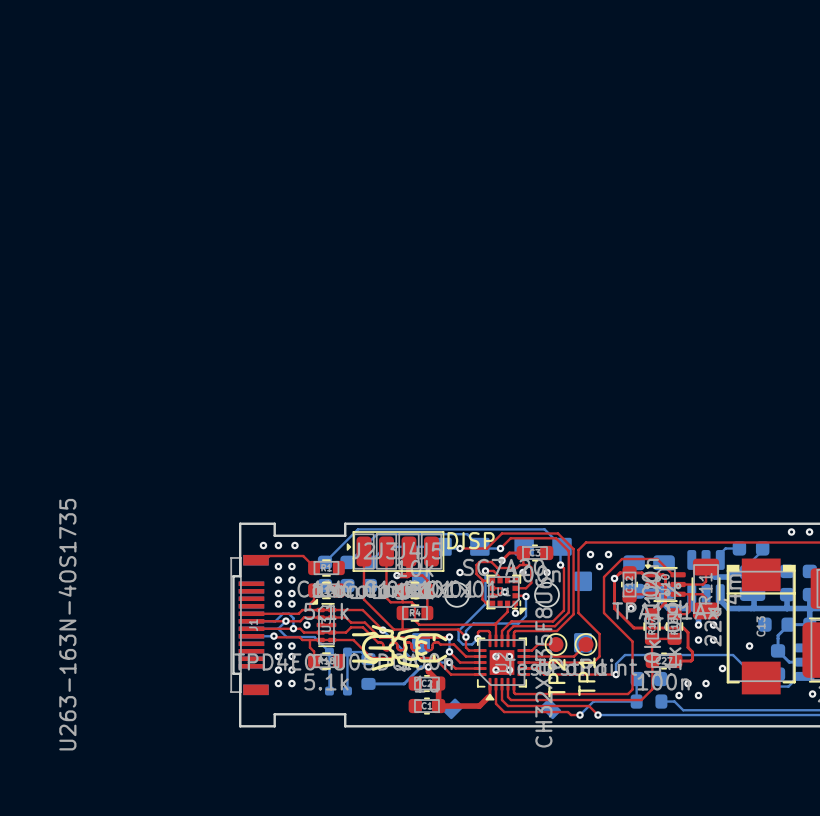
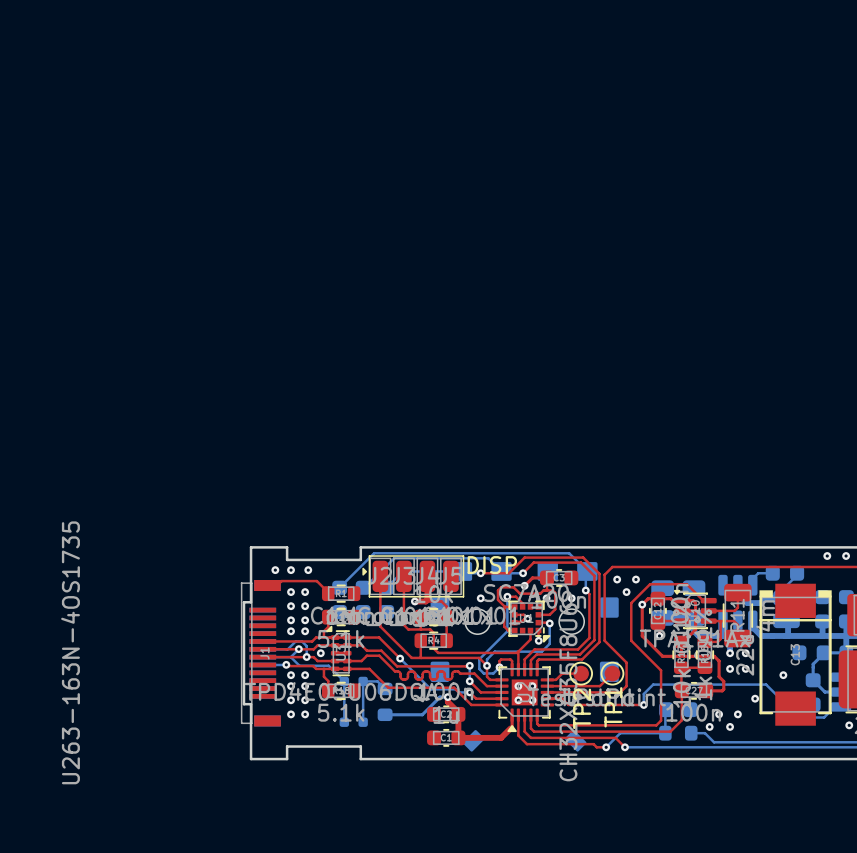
drawing: [351, 624, 448, 671] -> none

